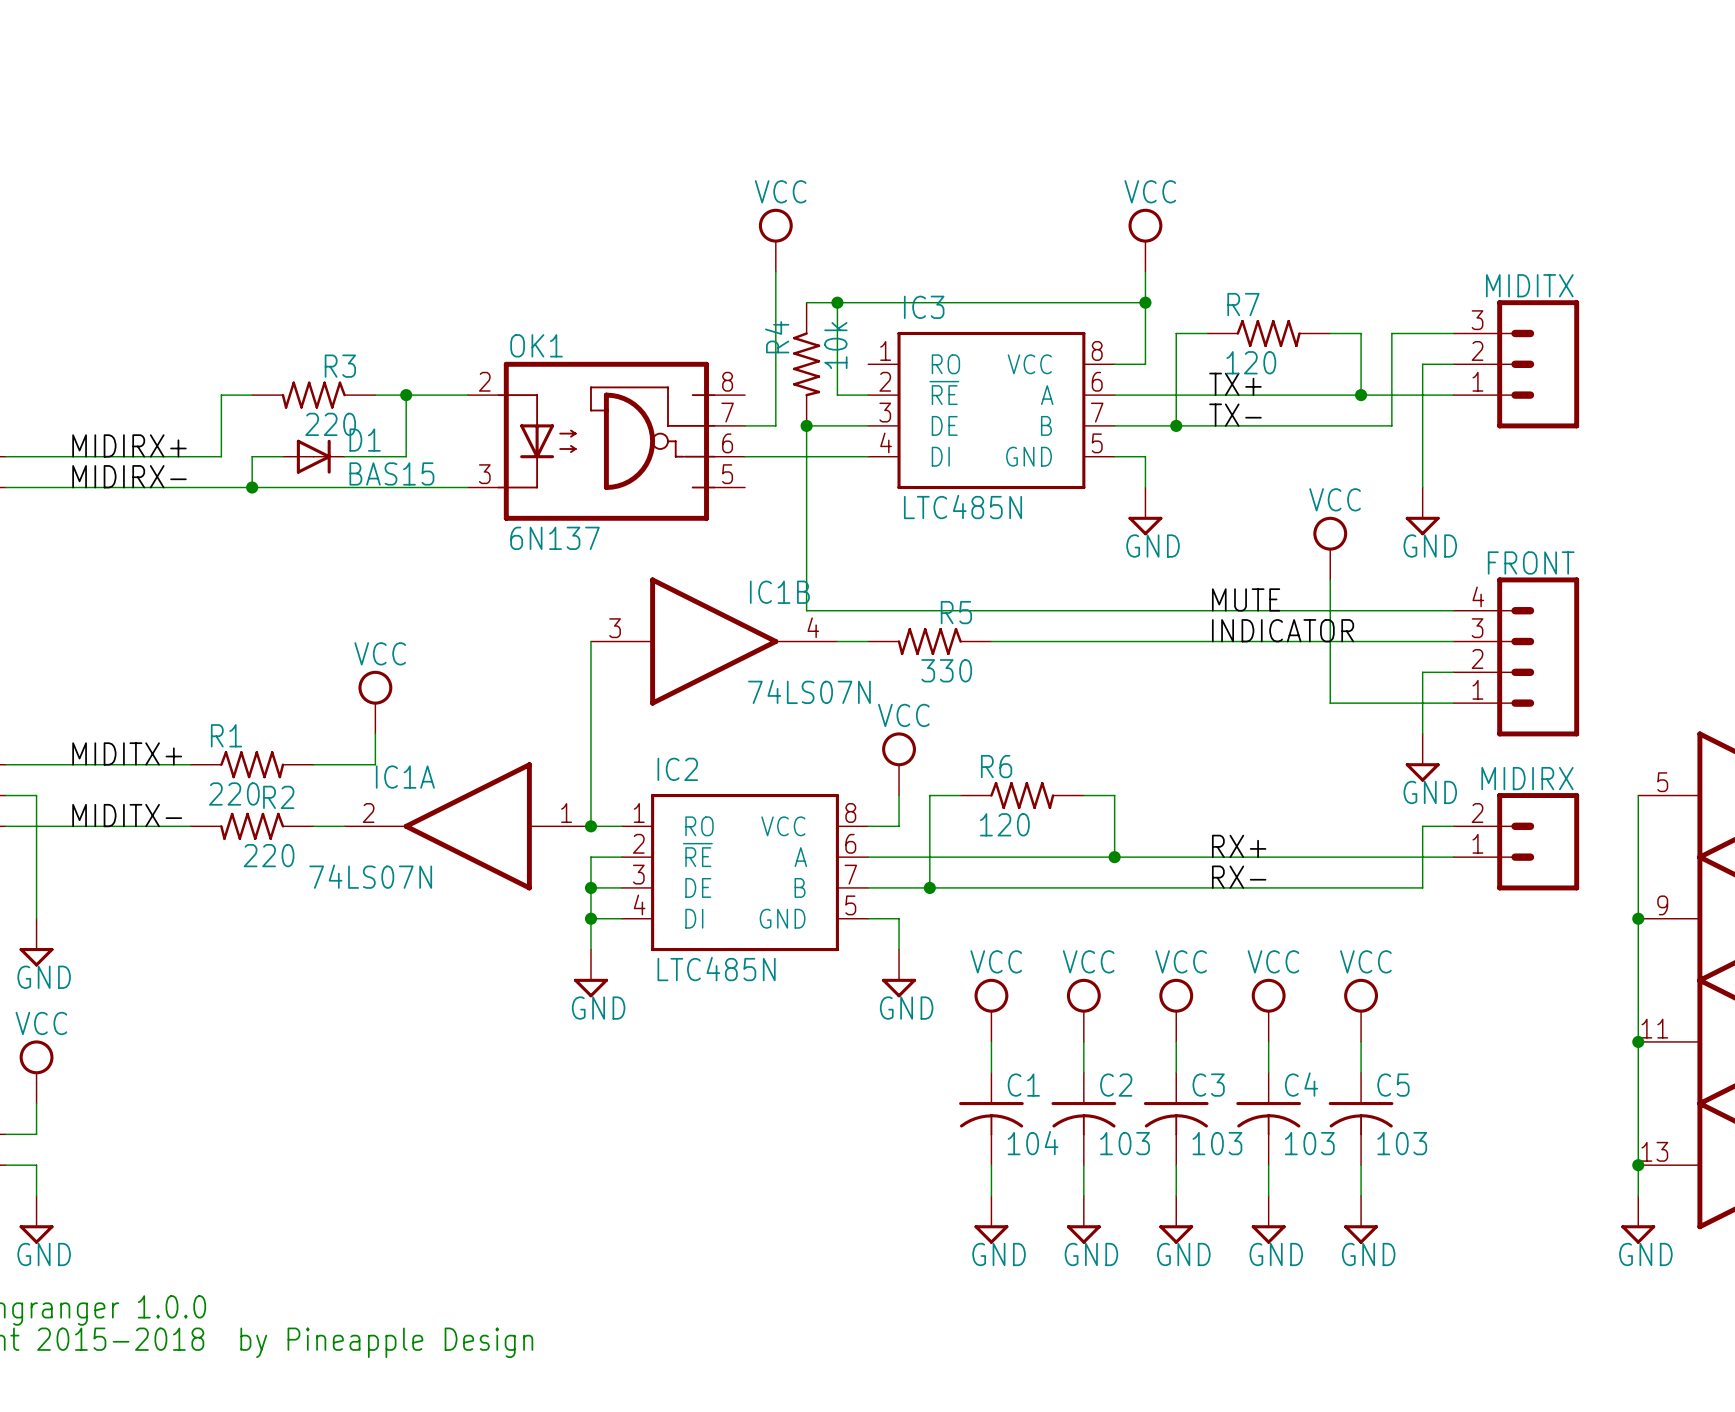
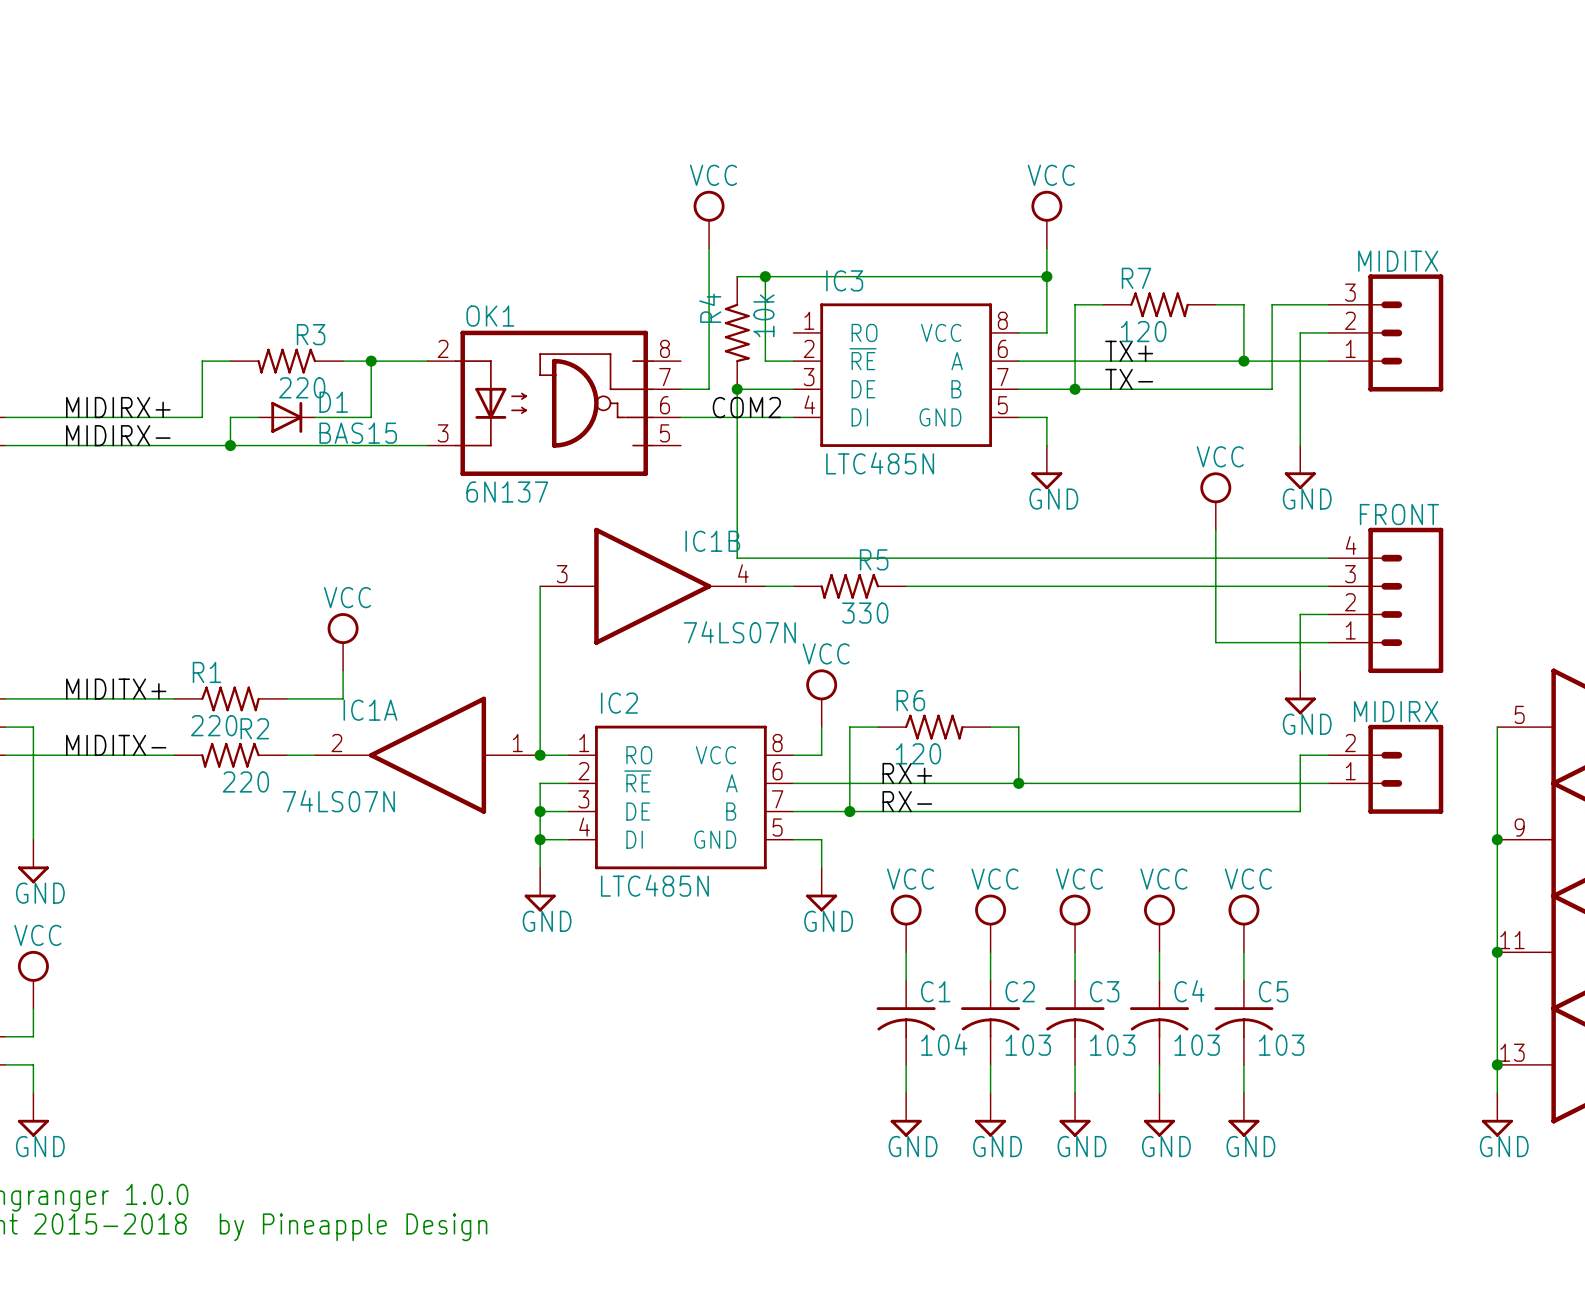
label: none -> COM2 (746, 407)
label: MUTE (1246, 599) -> none
label: INDICATOR (1283, 630) -> none
label position: RX+ (1239, 846) -> RX+ (907, 773)
label position: RX- (1239, 877) -> RX- (907, 801)

